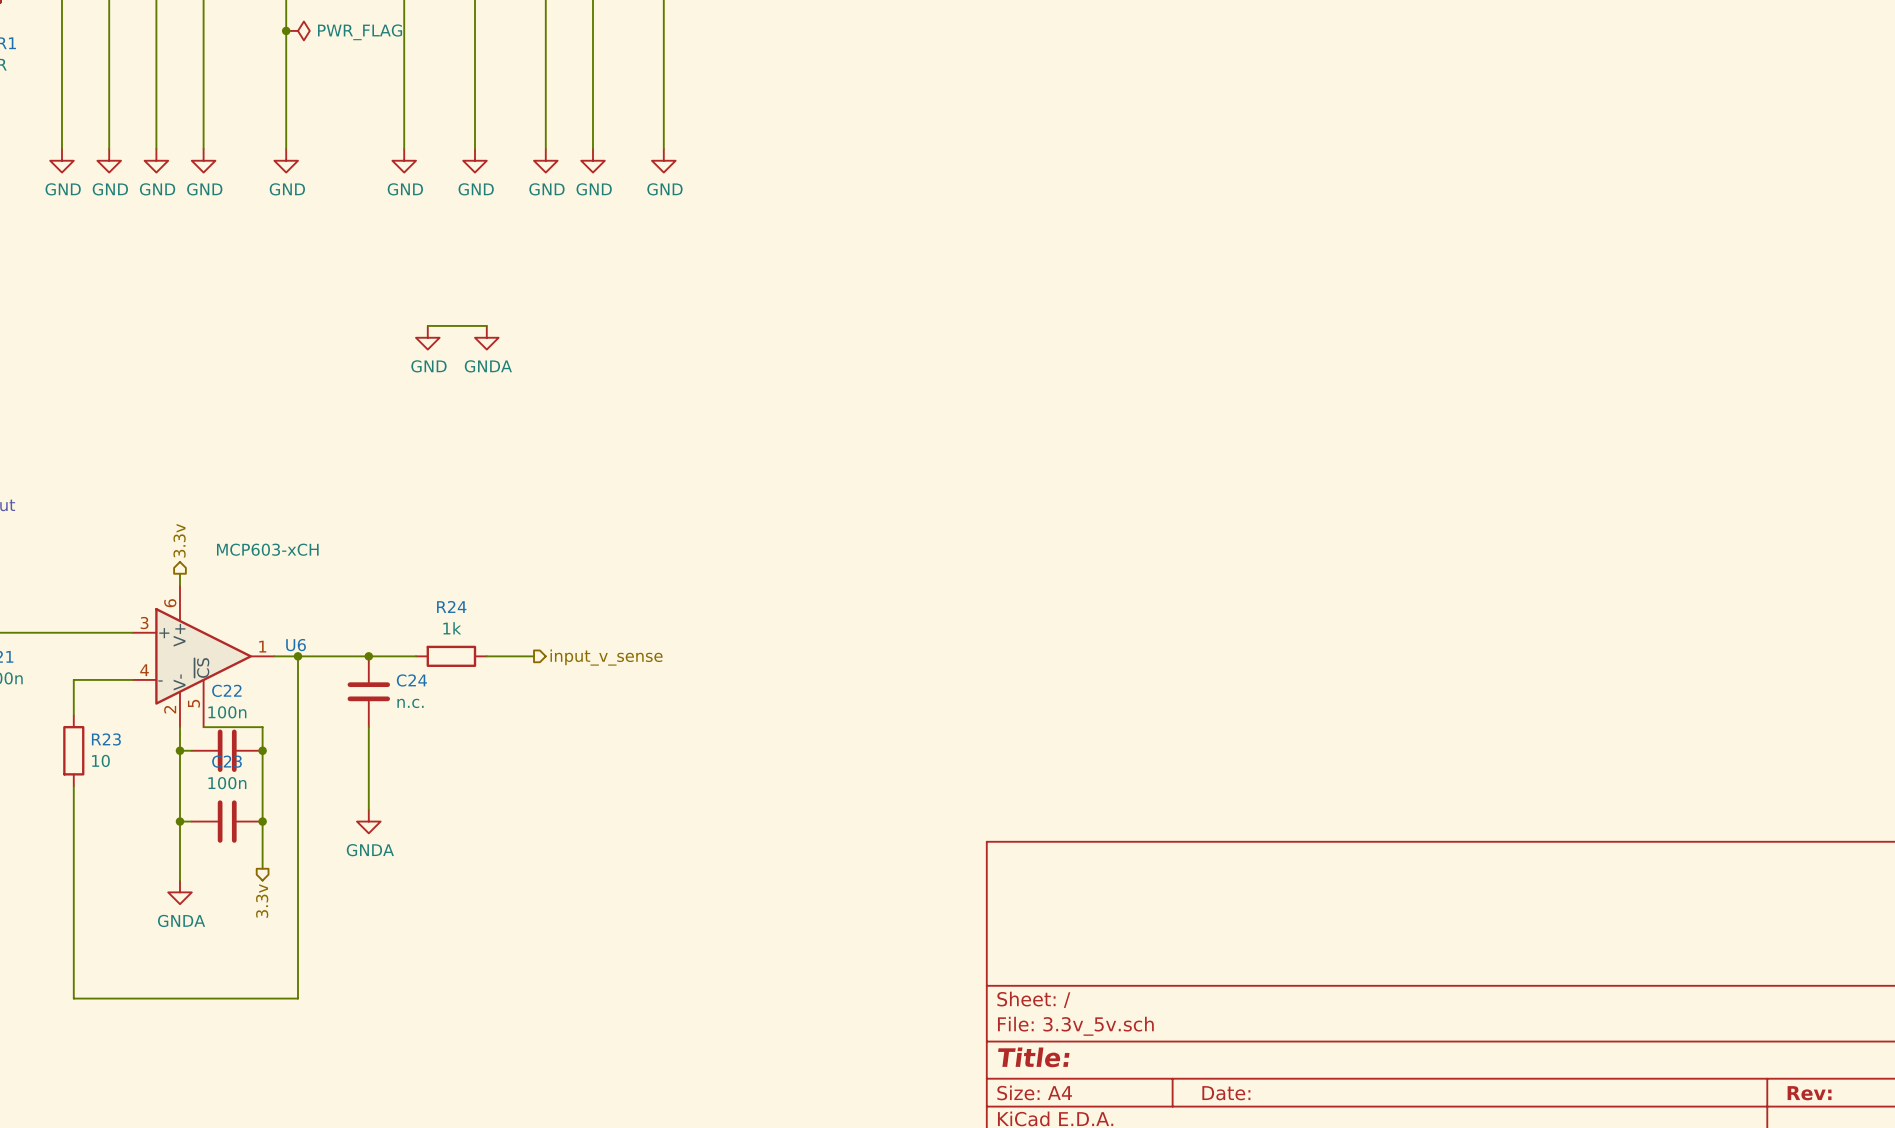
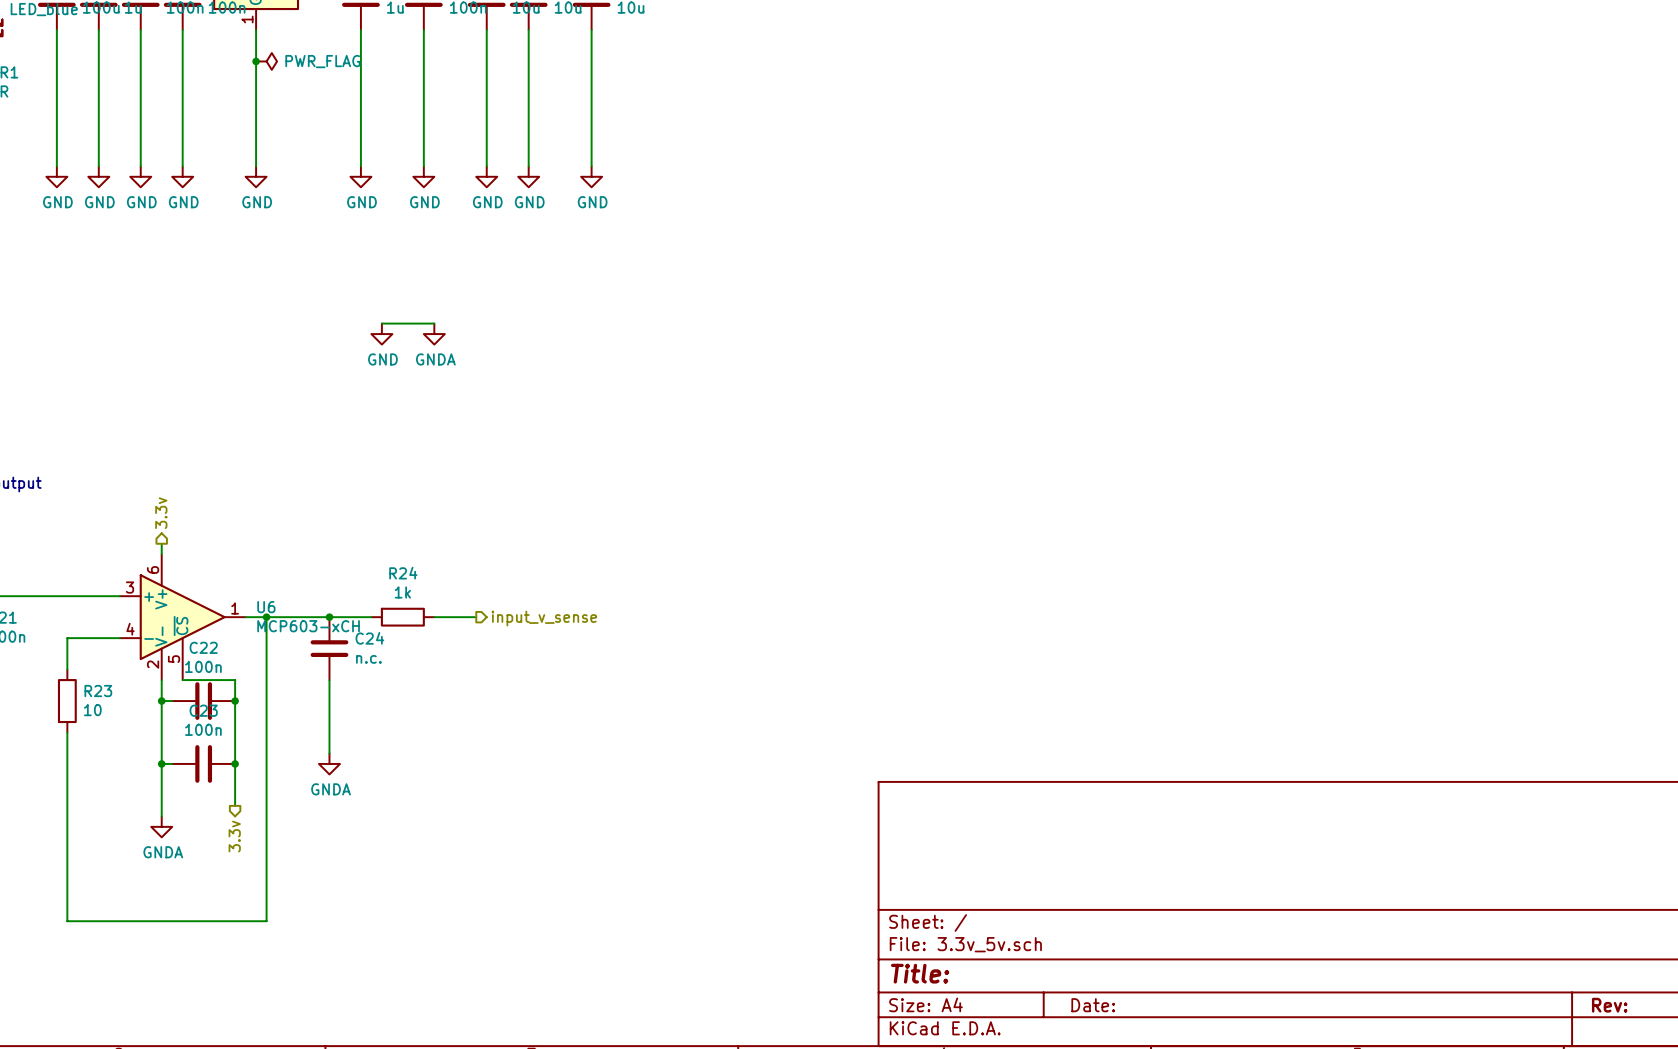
U6 value position: MCP603-xCH (267, 549) -> MCP603-xCH (308, 626)

